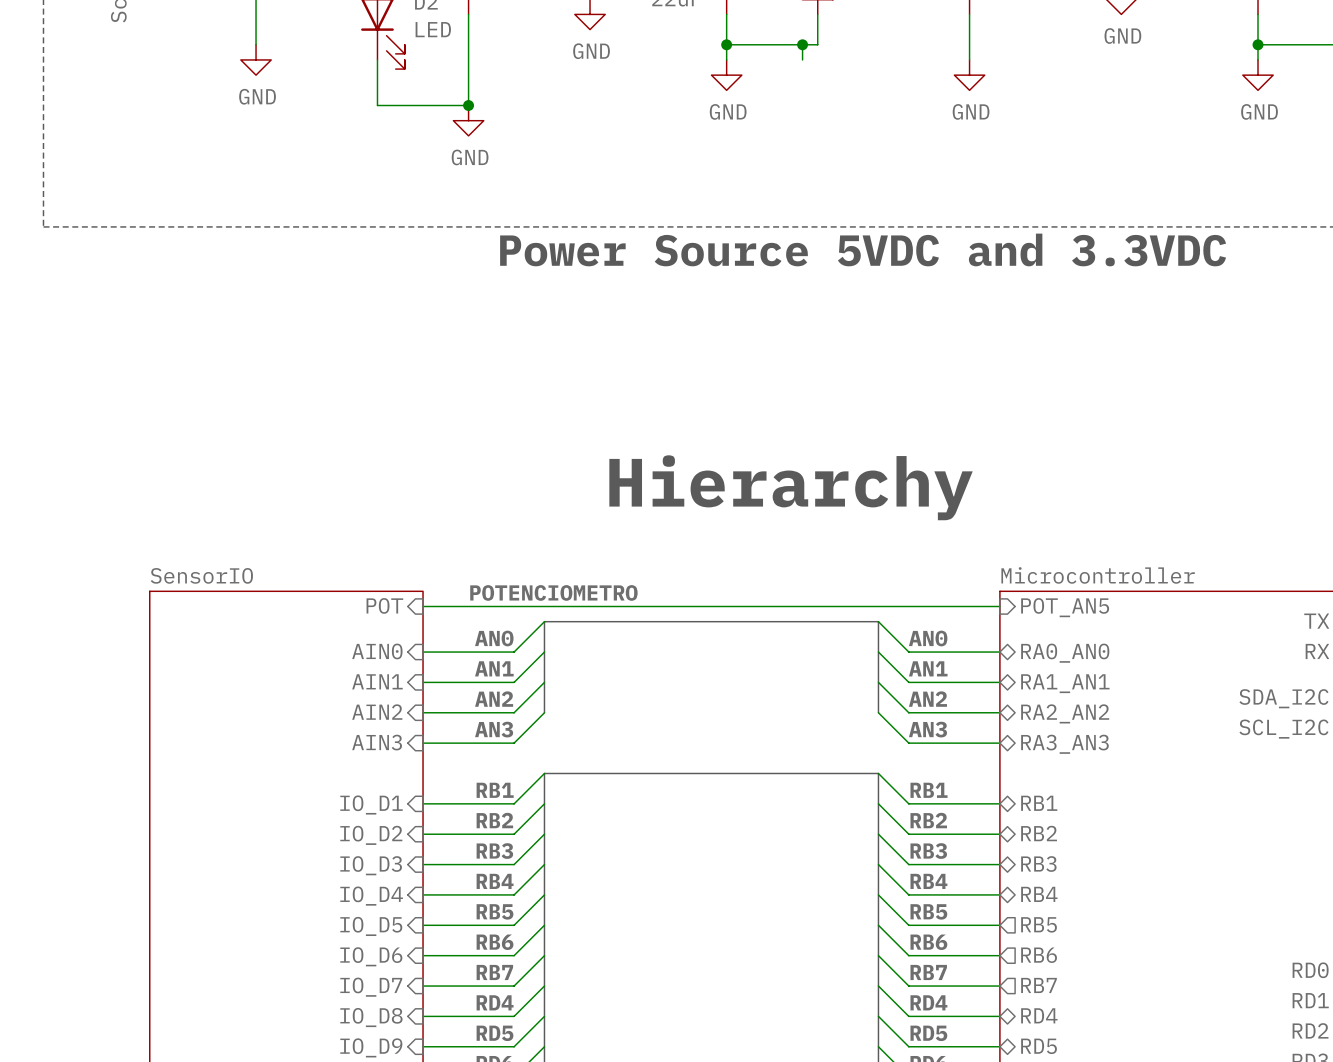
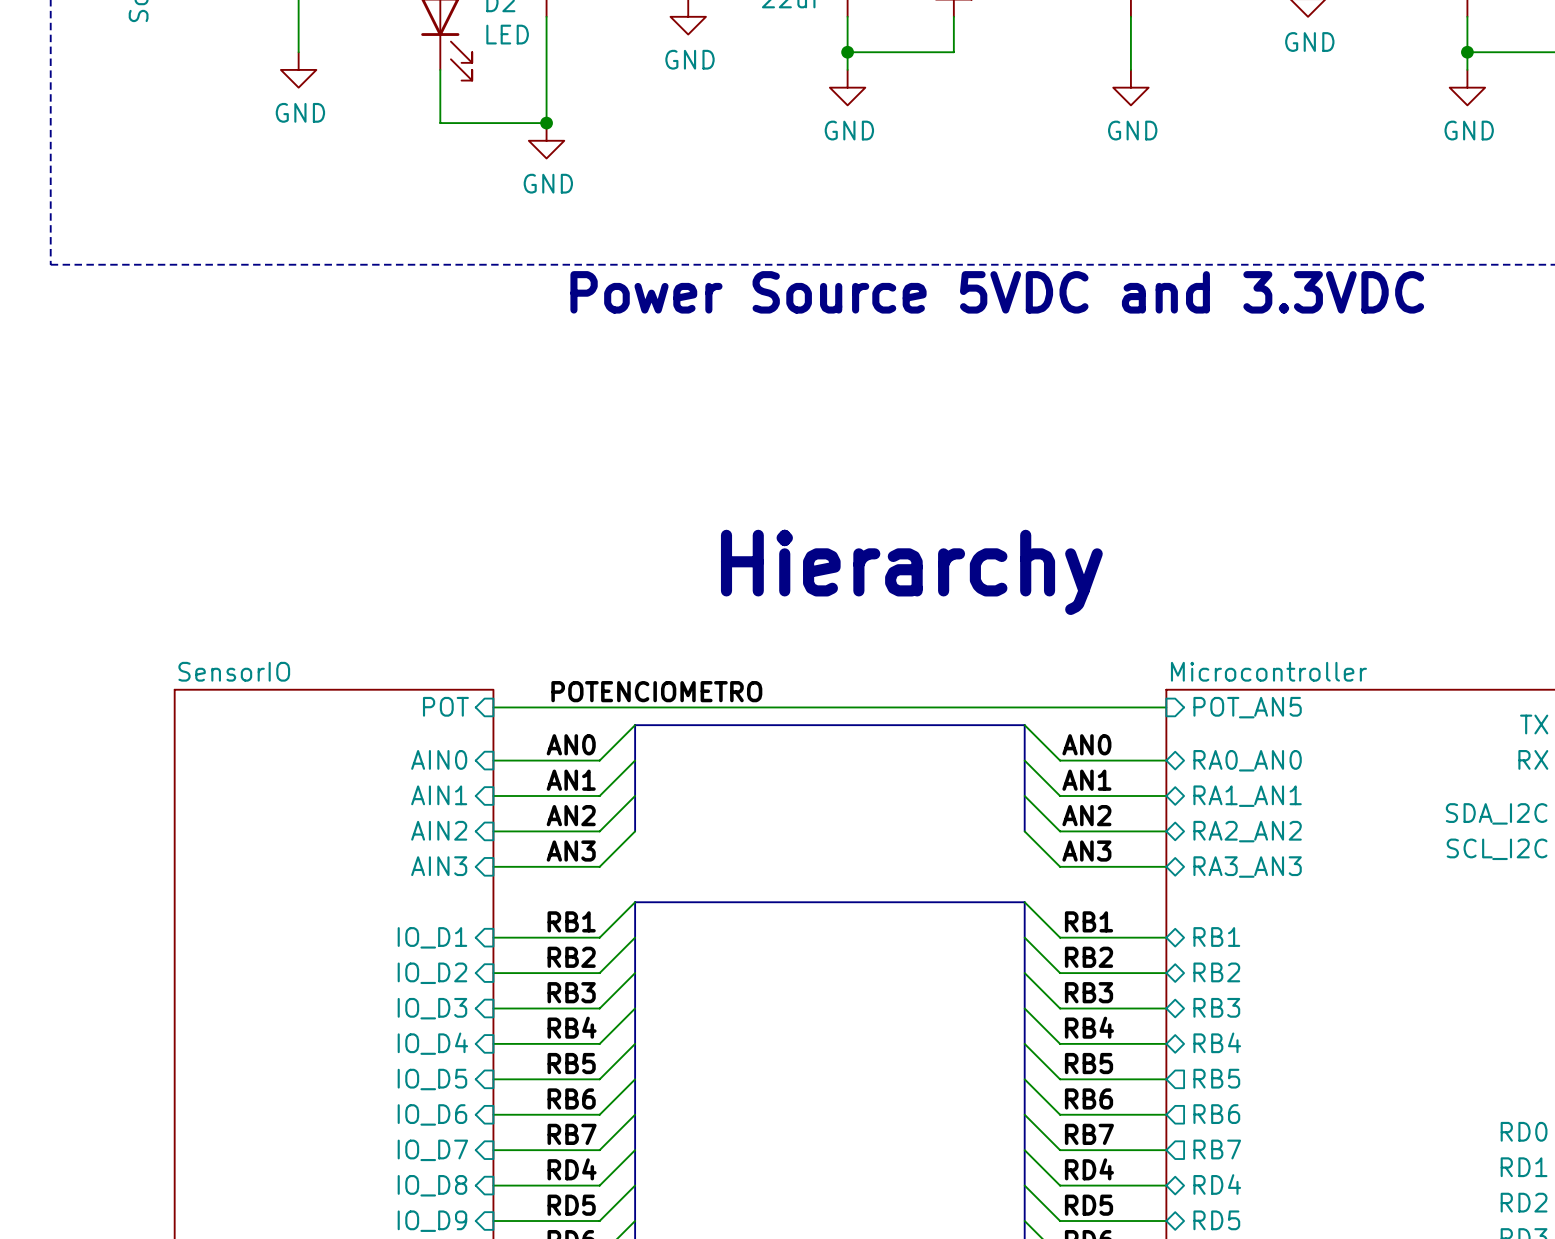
wire: (802, 44) (802, 59) -> none
junction: (802, 44) -> none

